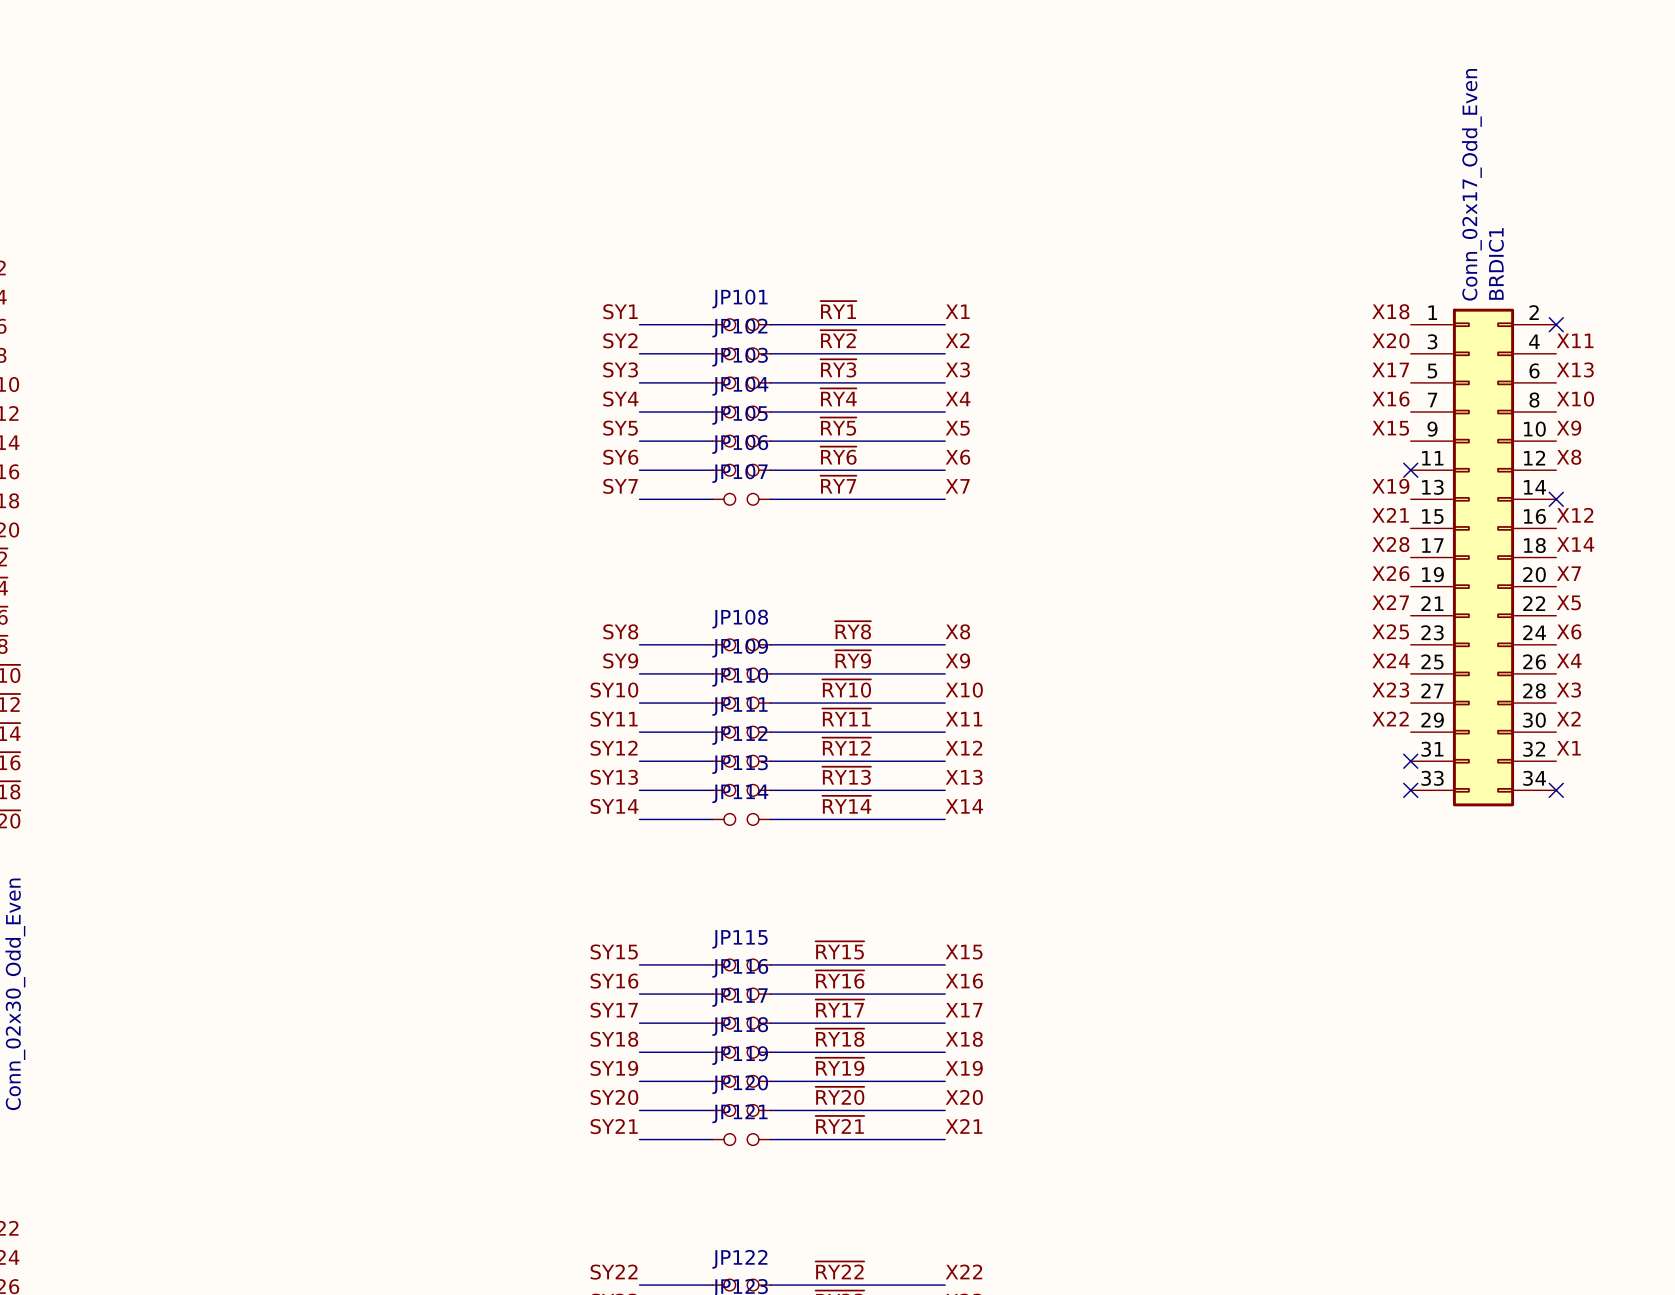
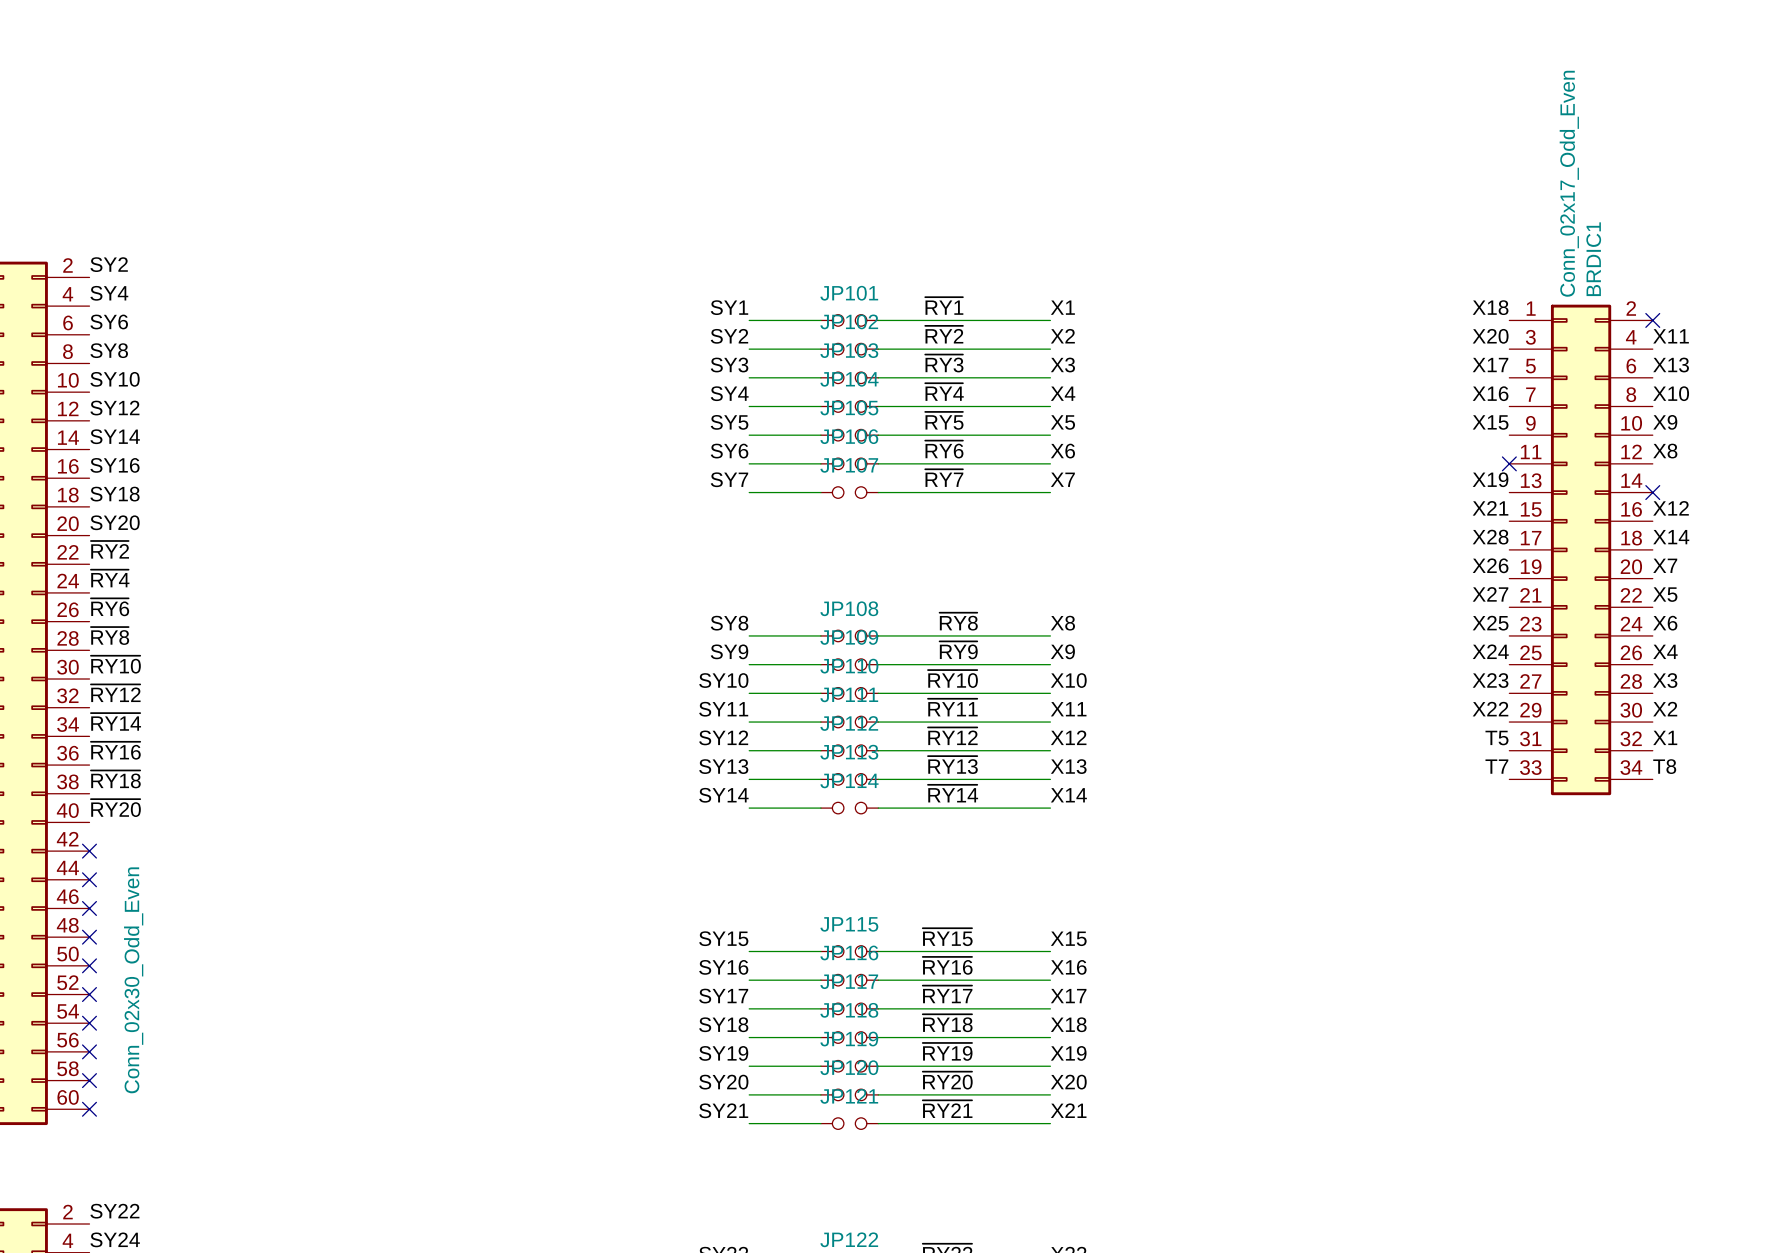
label: none -> T5 (1496, 738)
no-connect mark: (1410, 761) -> none
label: none -> T7 (1496, 766)
label: none -> T8 (1664, 766)
no-connect mark: (1410, 790) -> none
no-connect mark: (1556, 790) -> none

